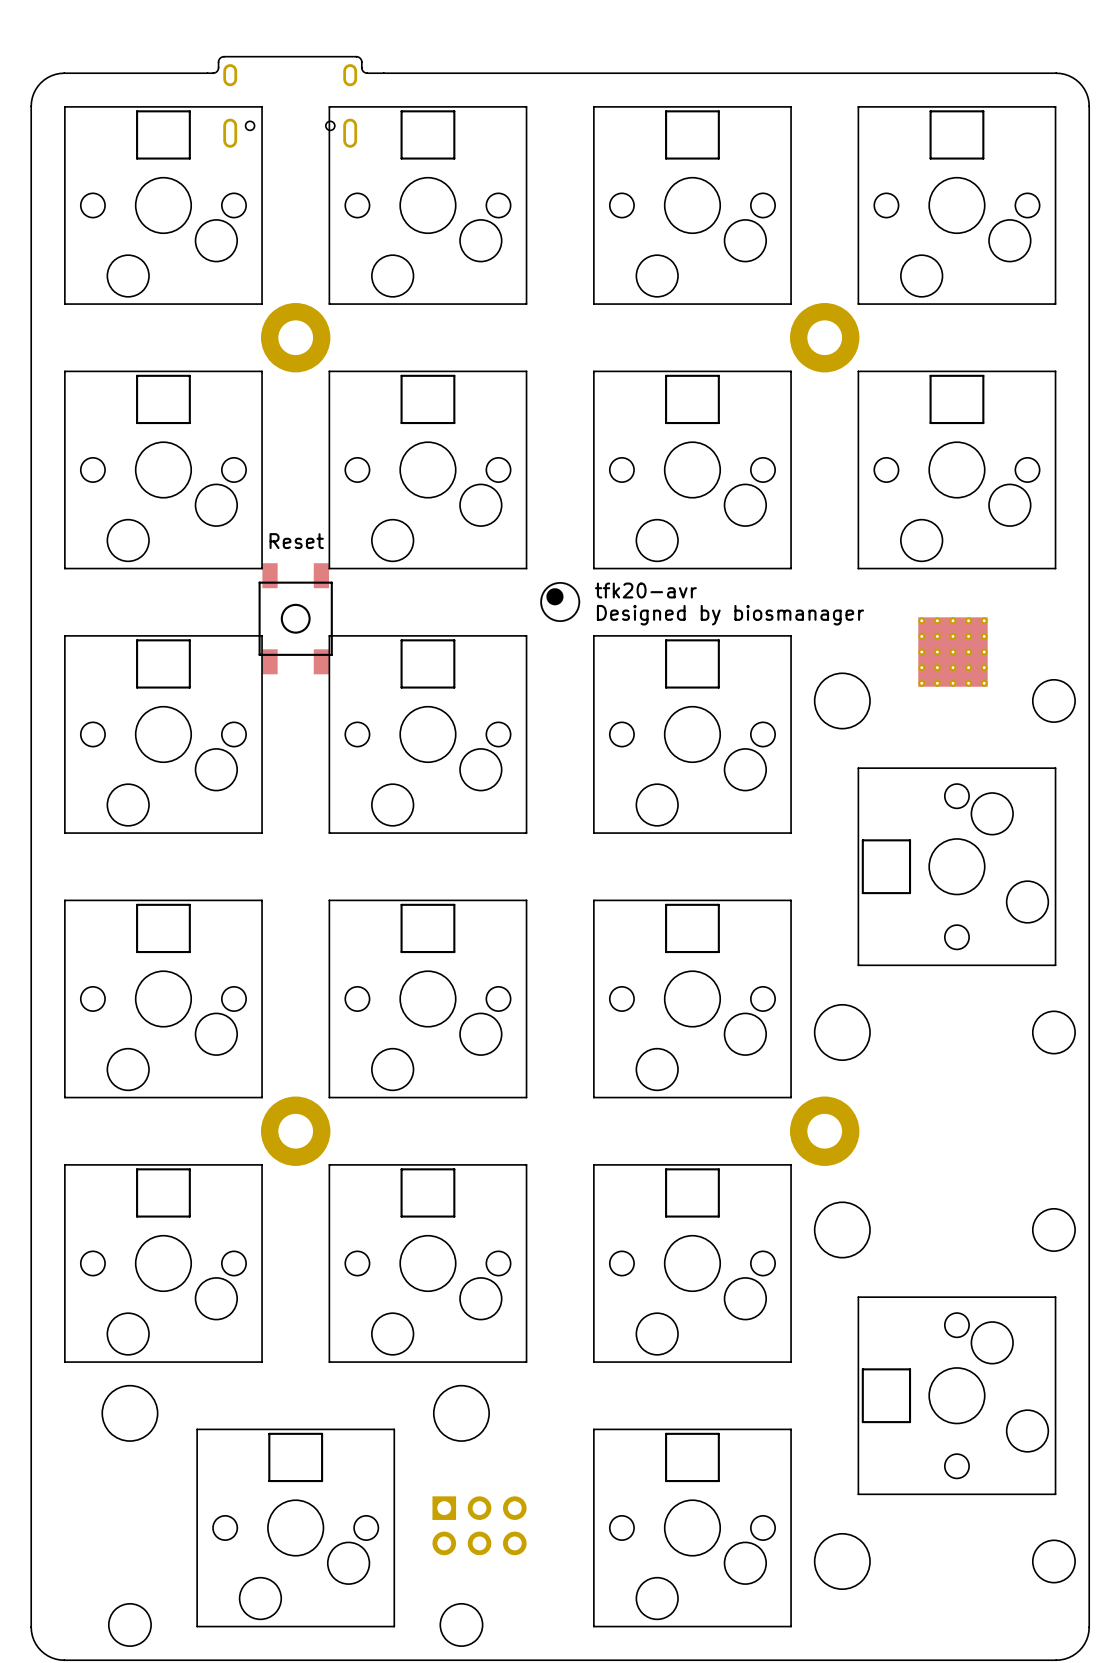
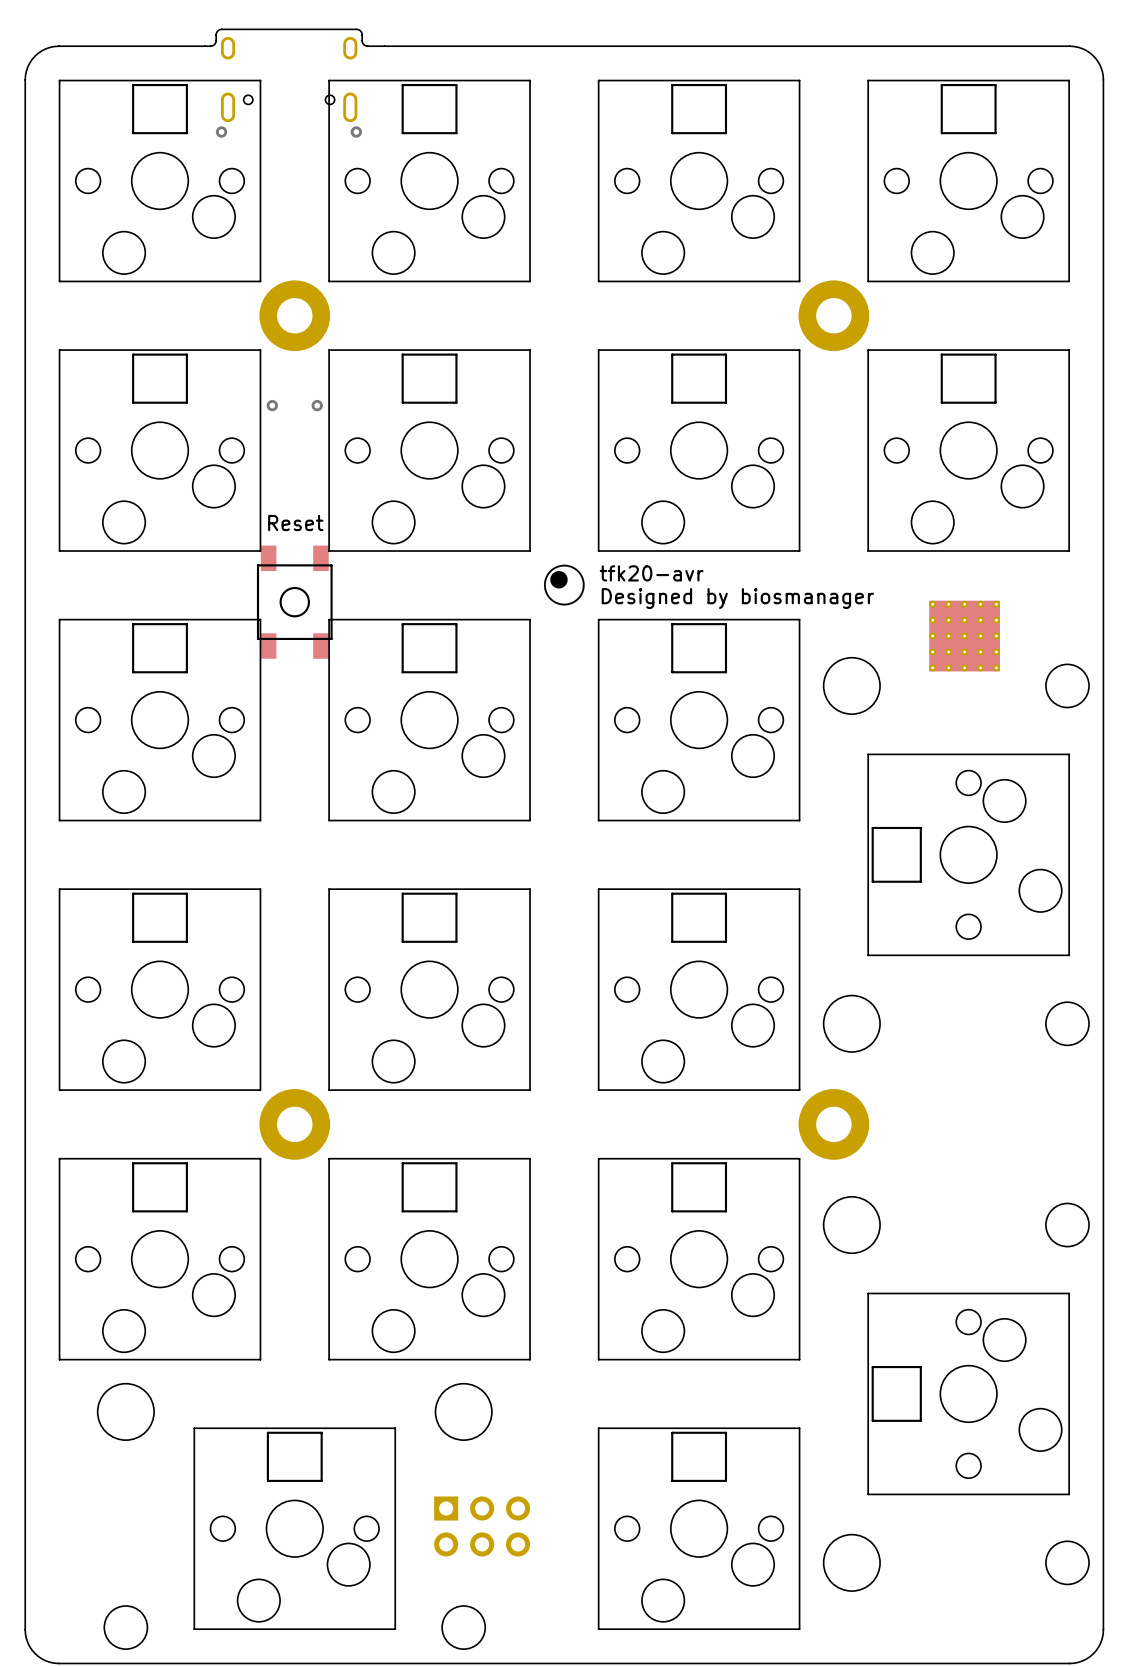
via: none -> (221, 132)
via: none -> (356, 132)
via: none -> (272, 405)
via: none -> (317, 405)

